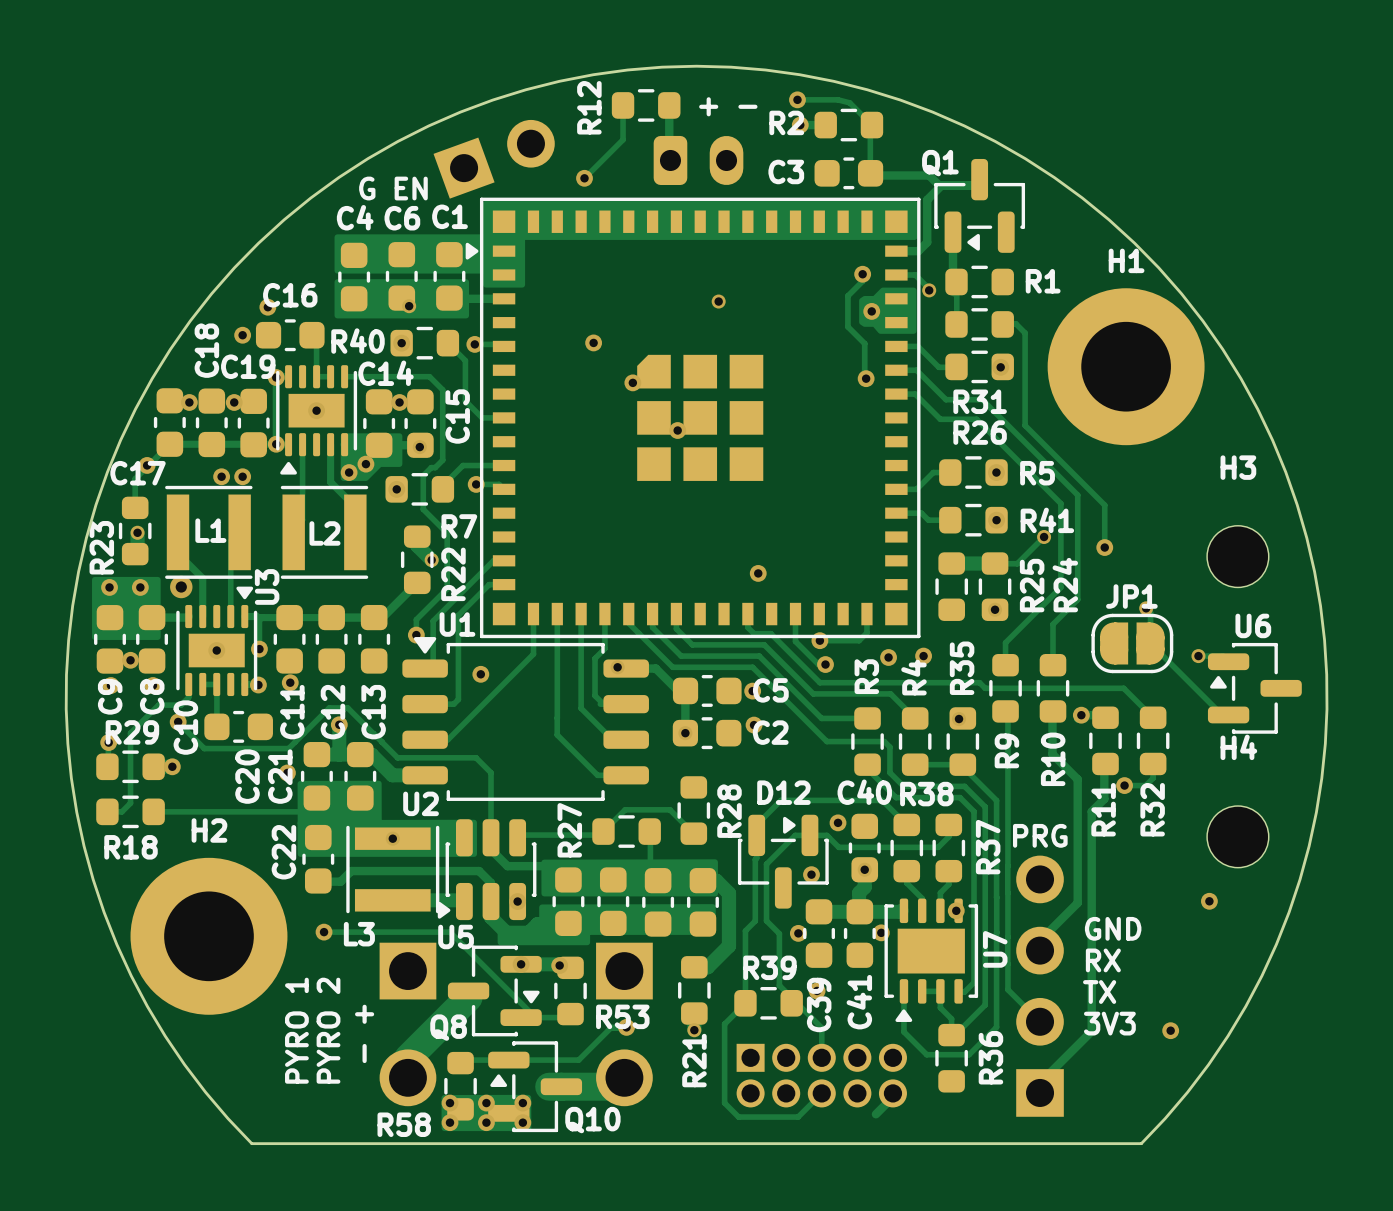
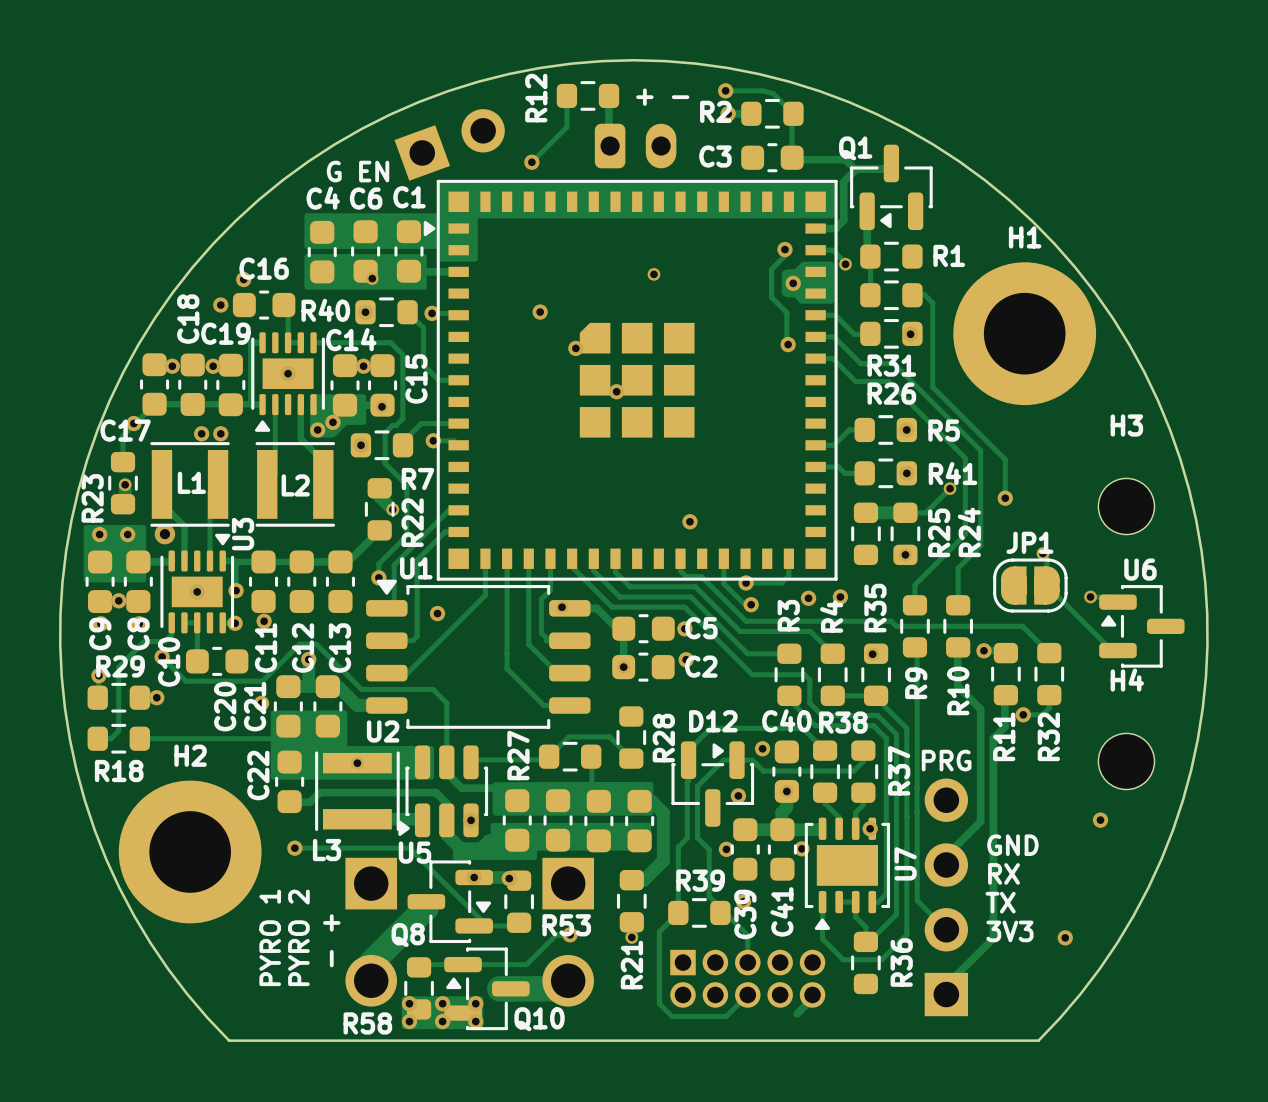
via: (276, 377) -> none
via: (276, 444) -> none

